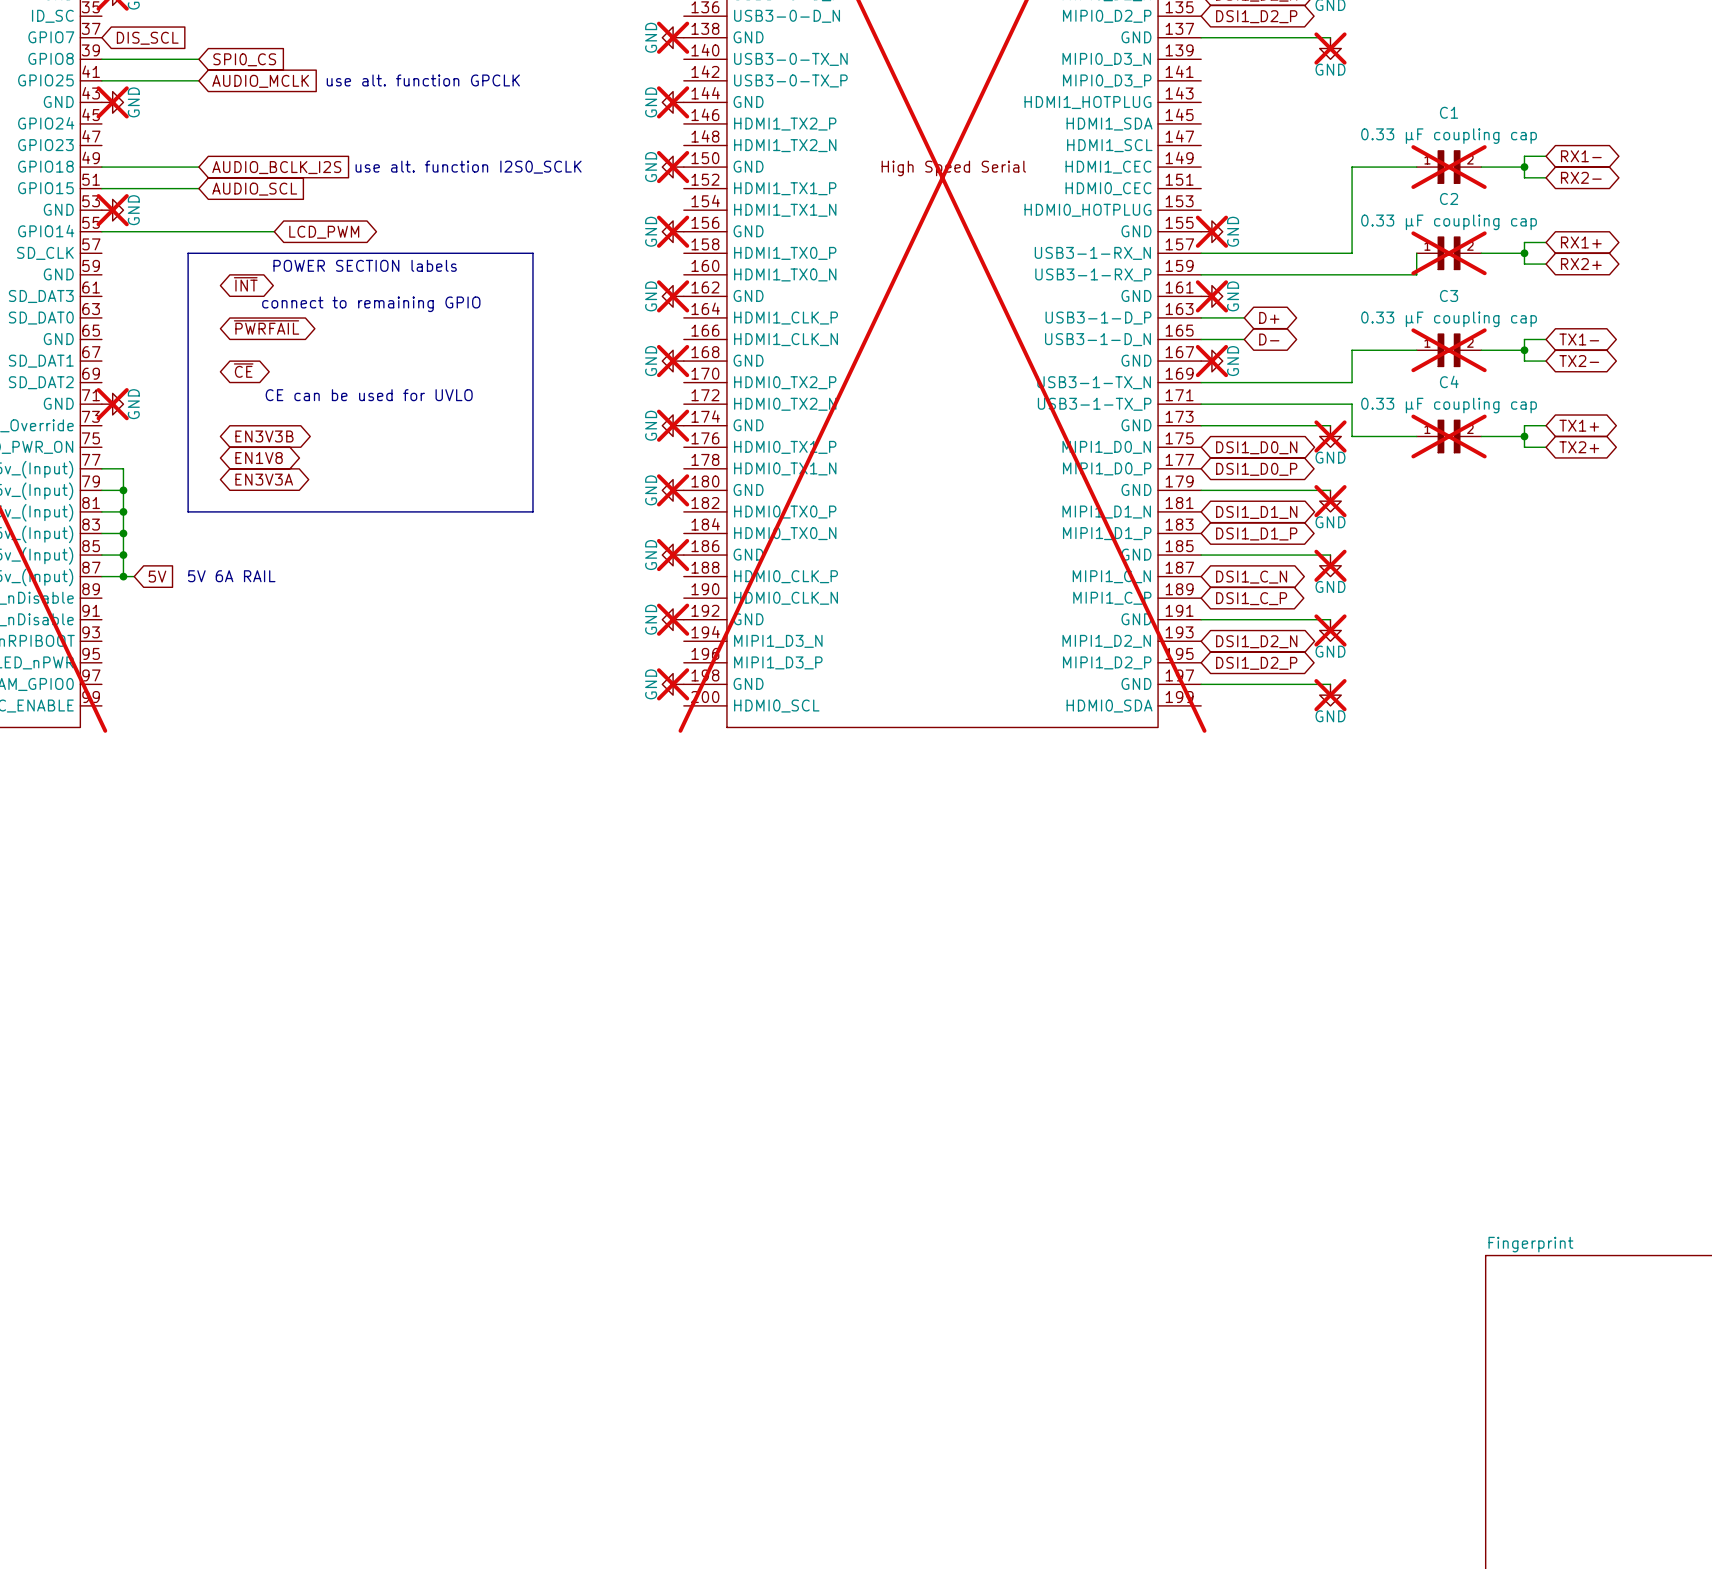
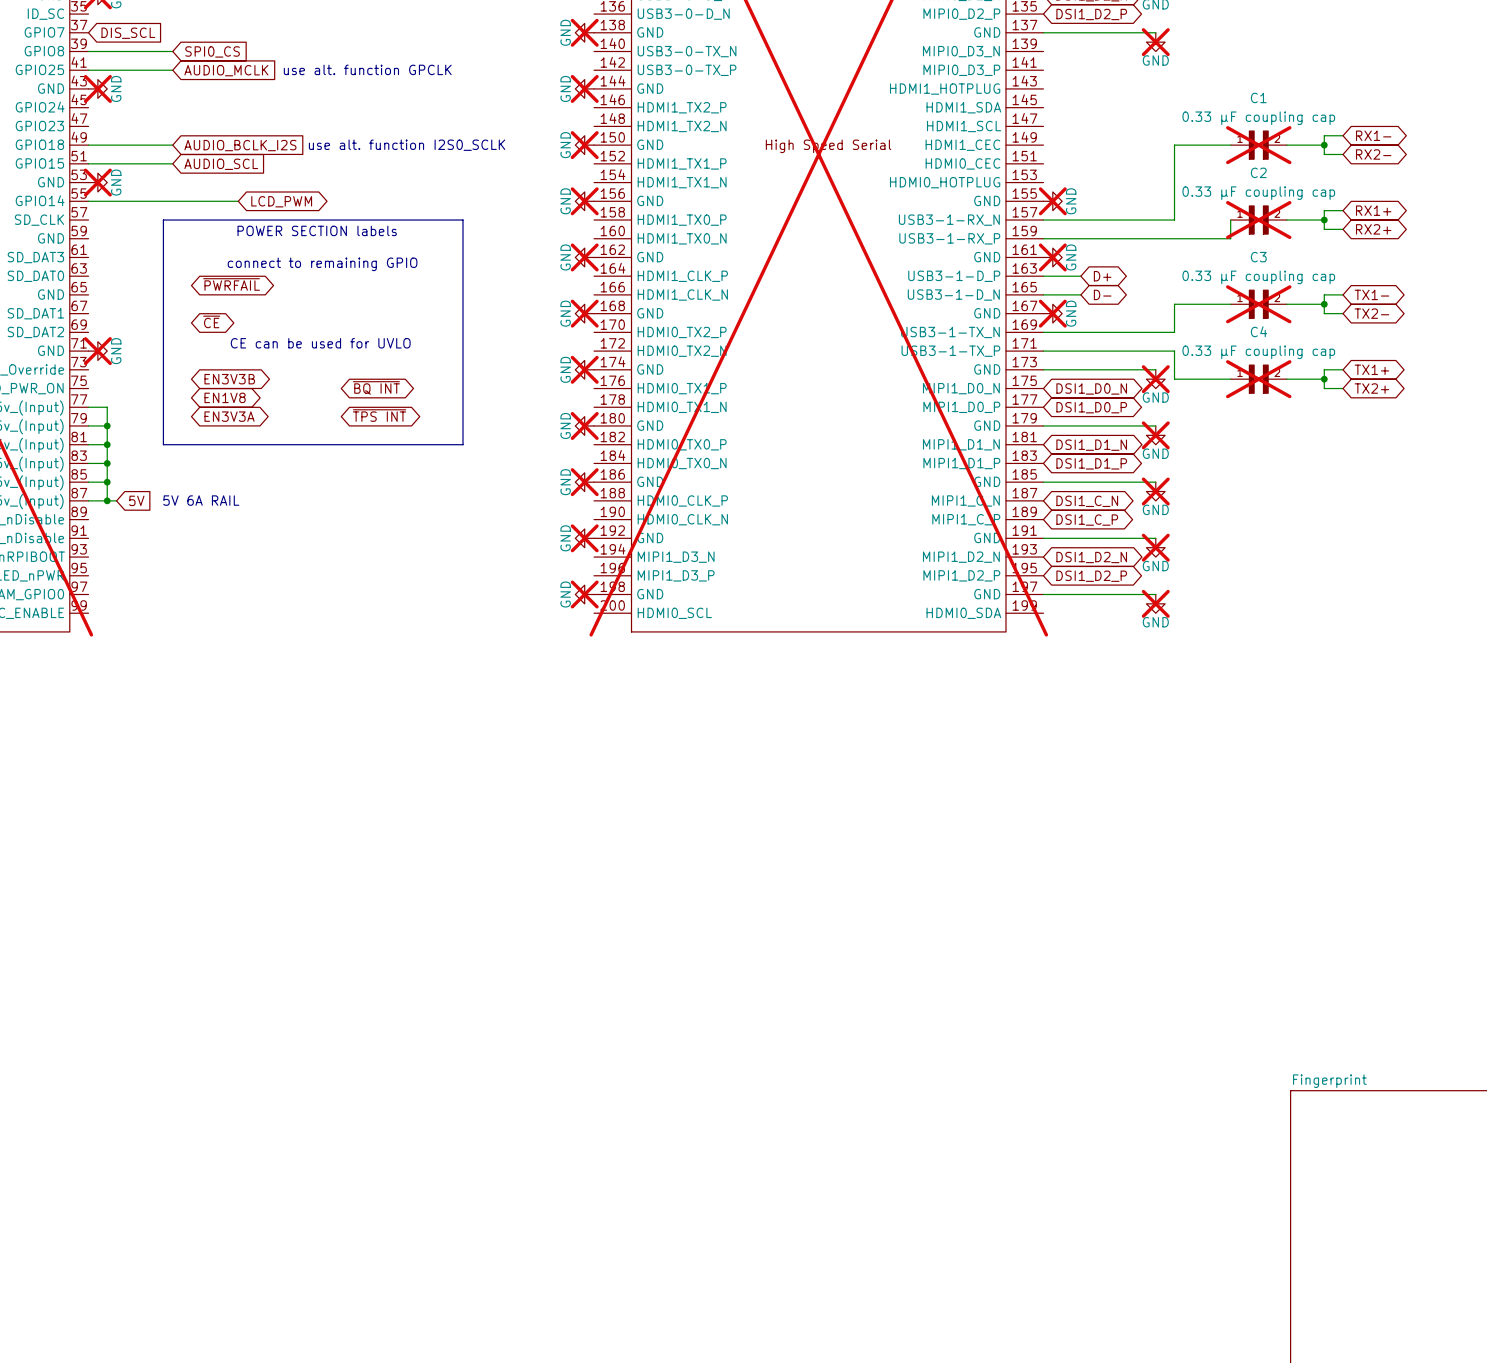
global label: ~{INT} (245, 284) -> none
global label: none -> ~{BQ INT} (376, 387)
global label: none -> ~{TPS INT} (379, 415)

